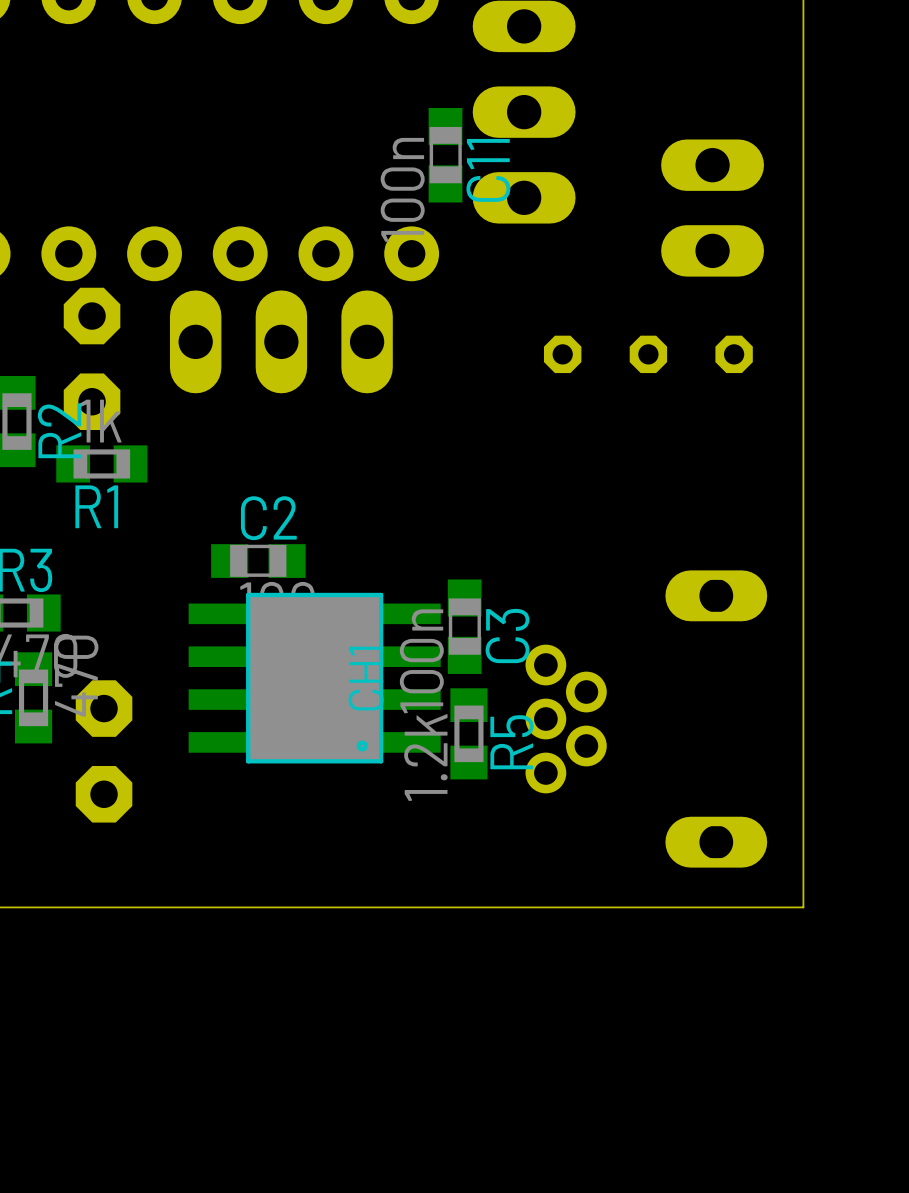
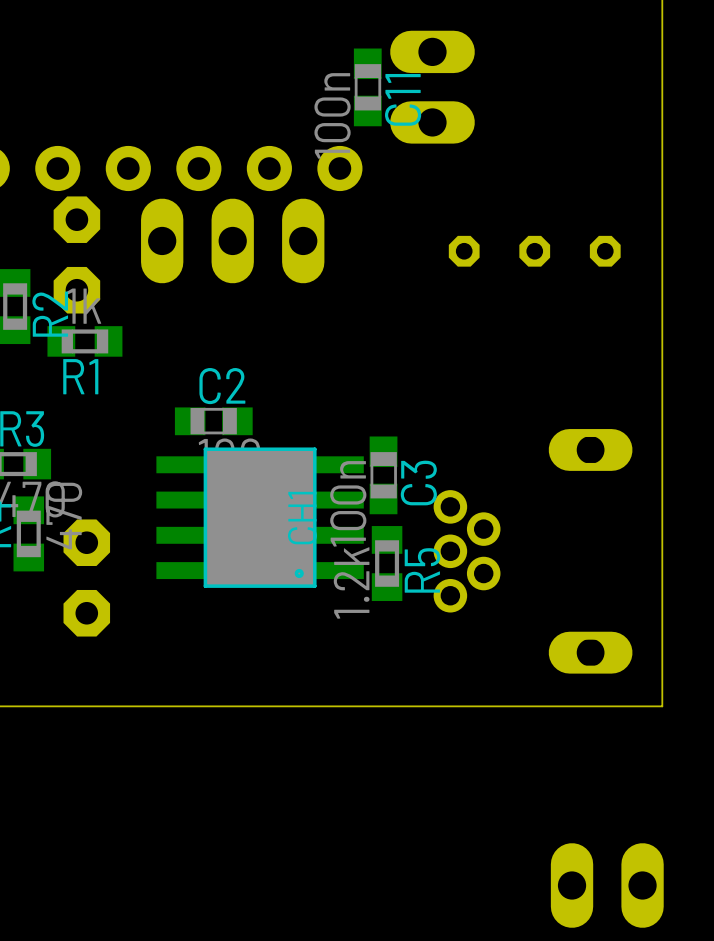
part: (712, 208) -> none
part: none -> (607, 885)

